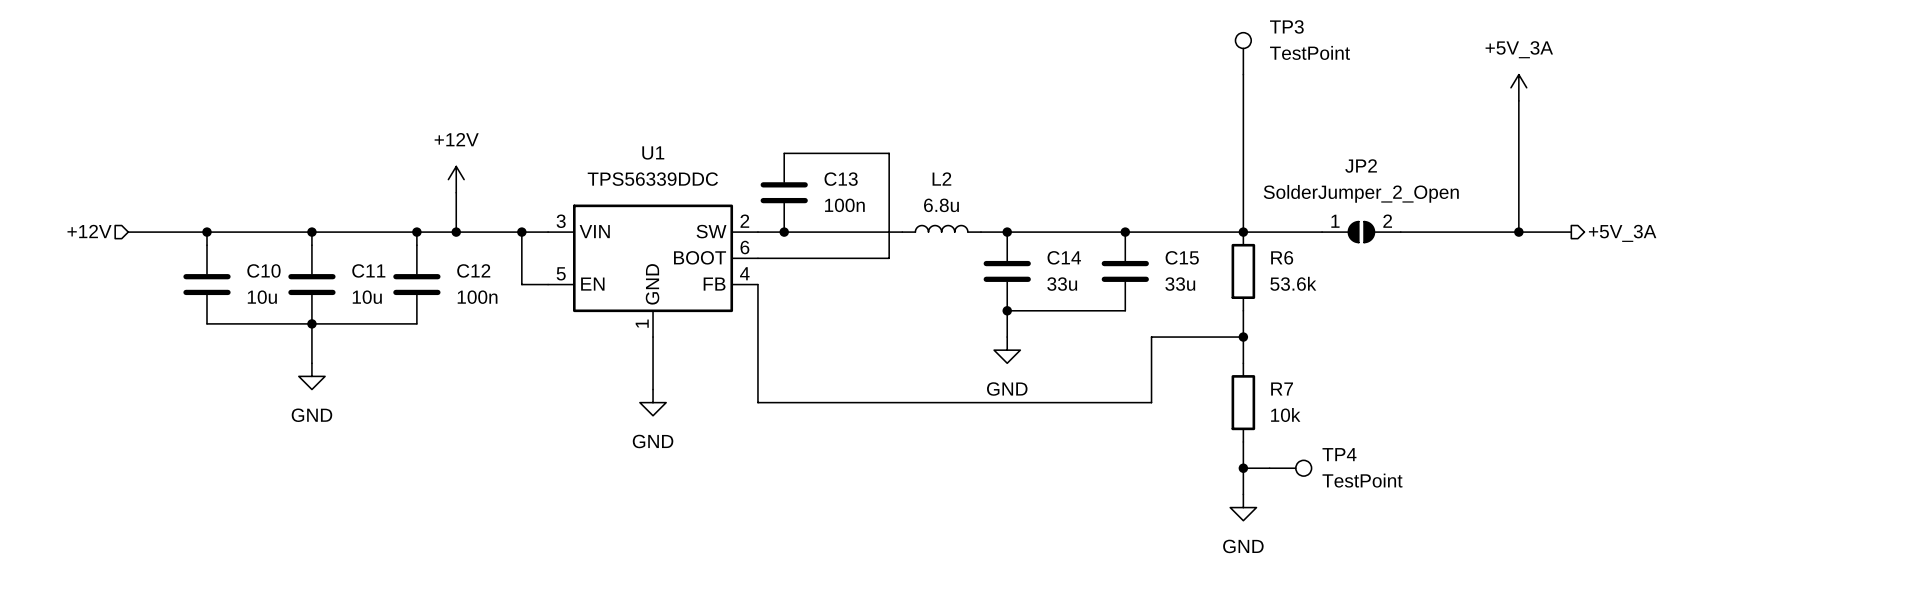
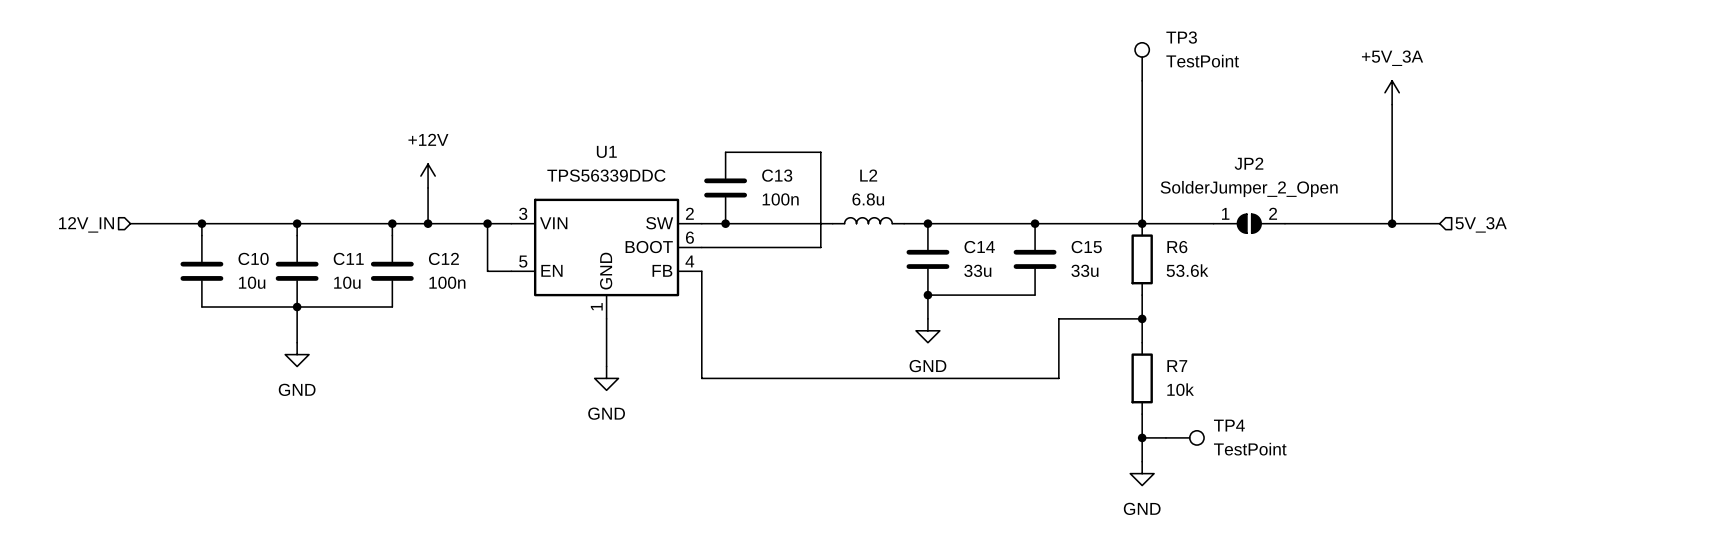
hierarchical label: +12V (89, 231) -> 12V_IN (86, 224)
hierarchical label shape: output (1622, 233) -> input (1481, 224)
hierarchical label: +5V_3A (1622, 233) -> 5V_3A (1481, 224)

